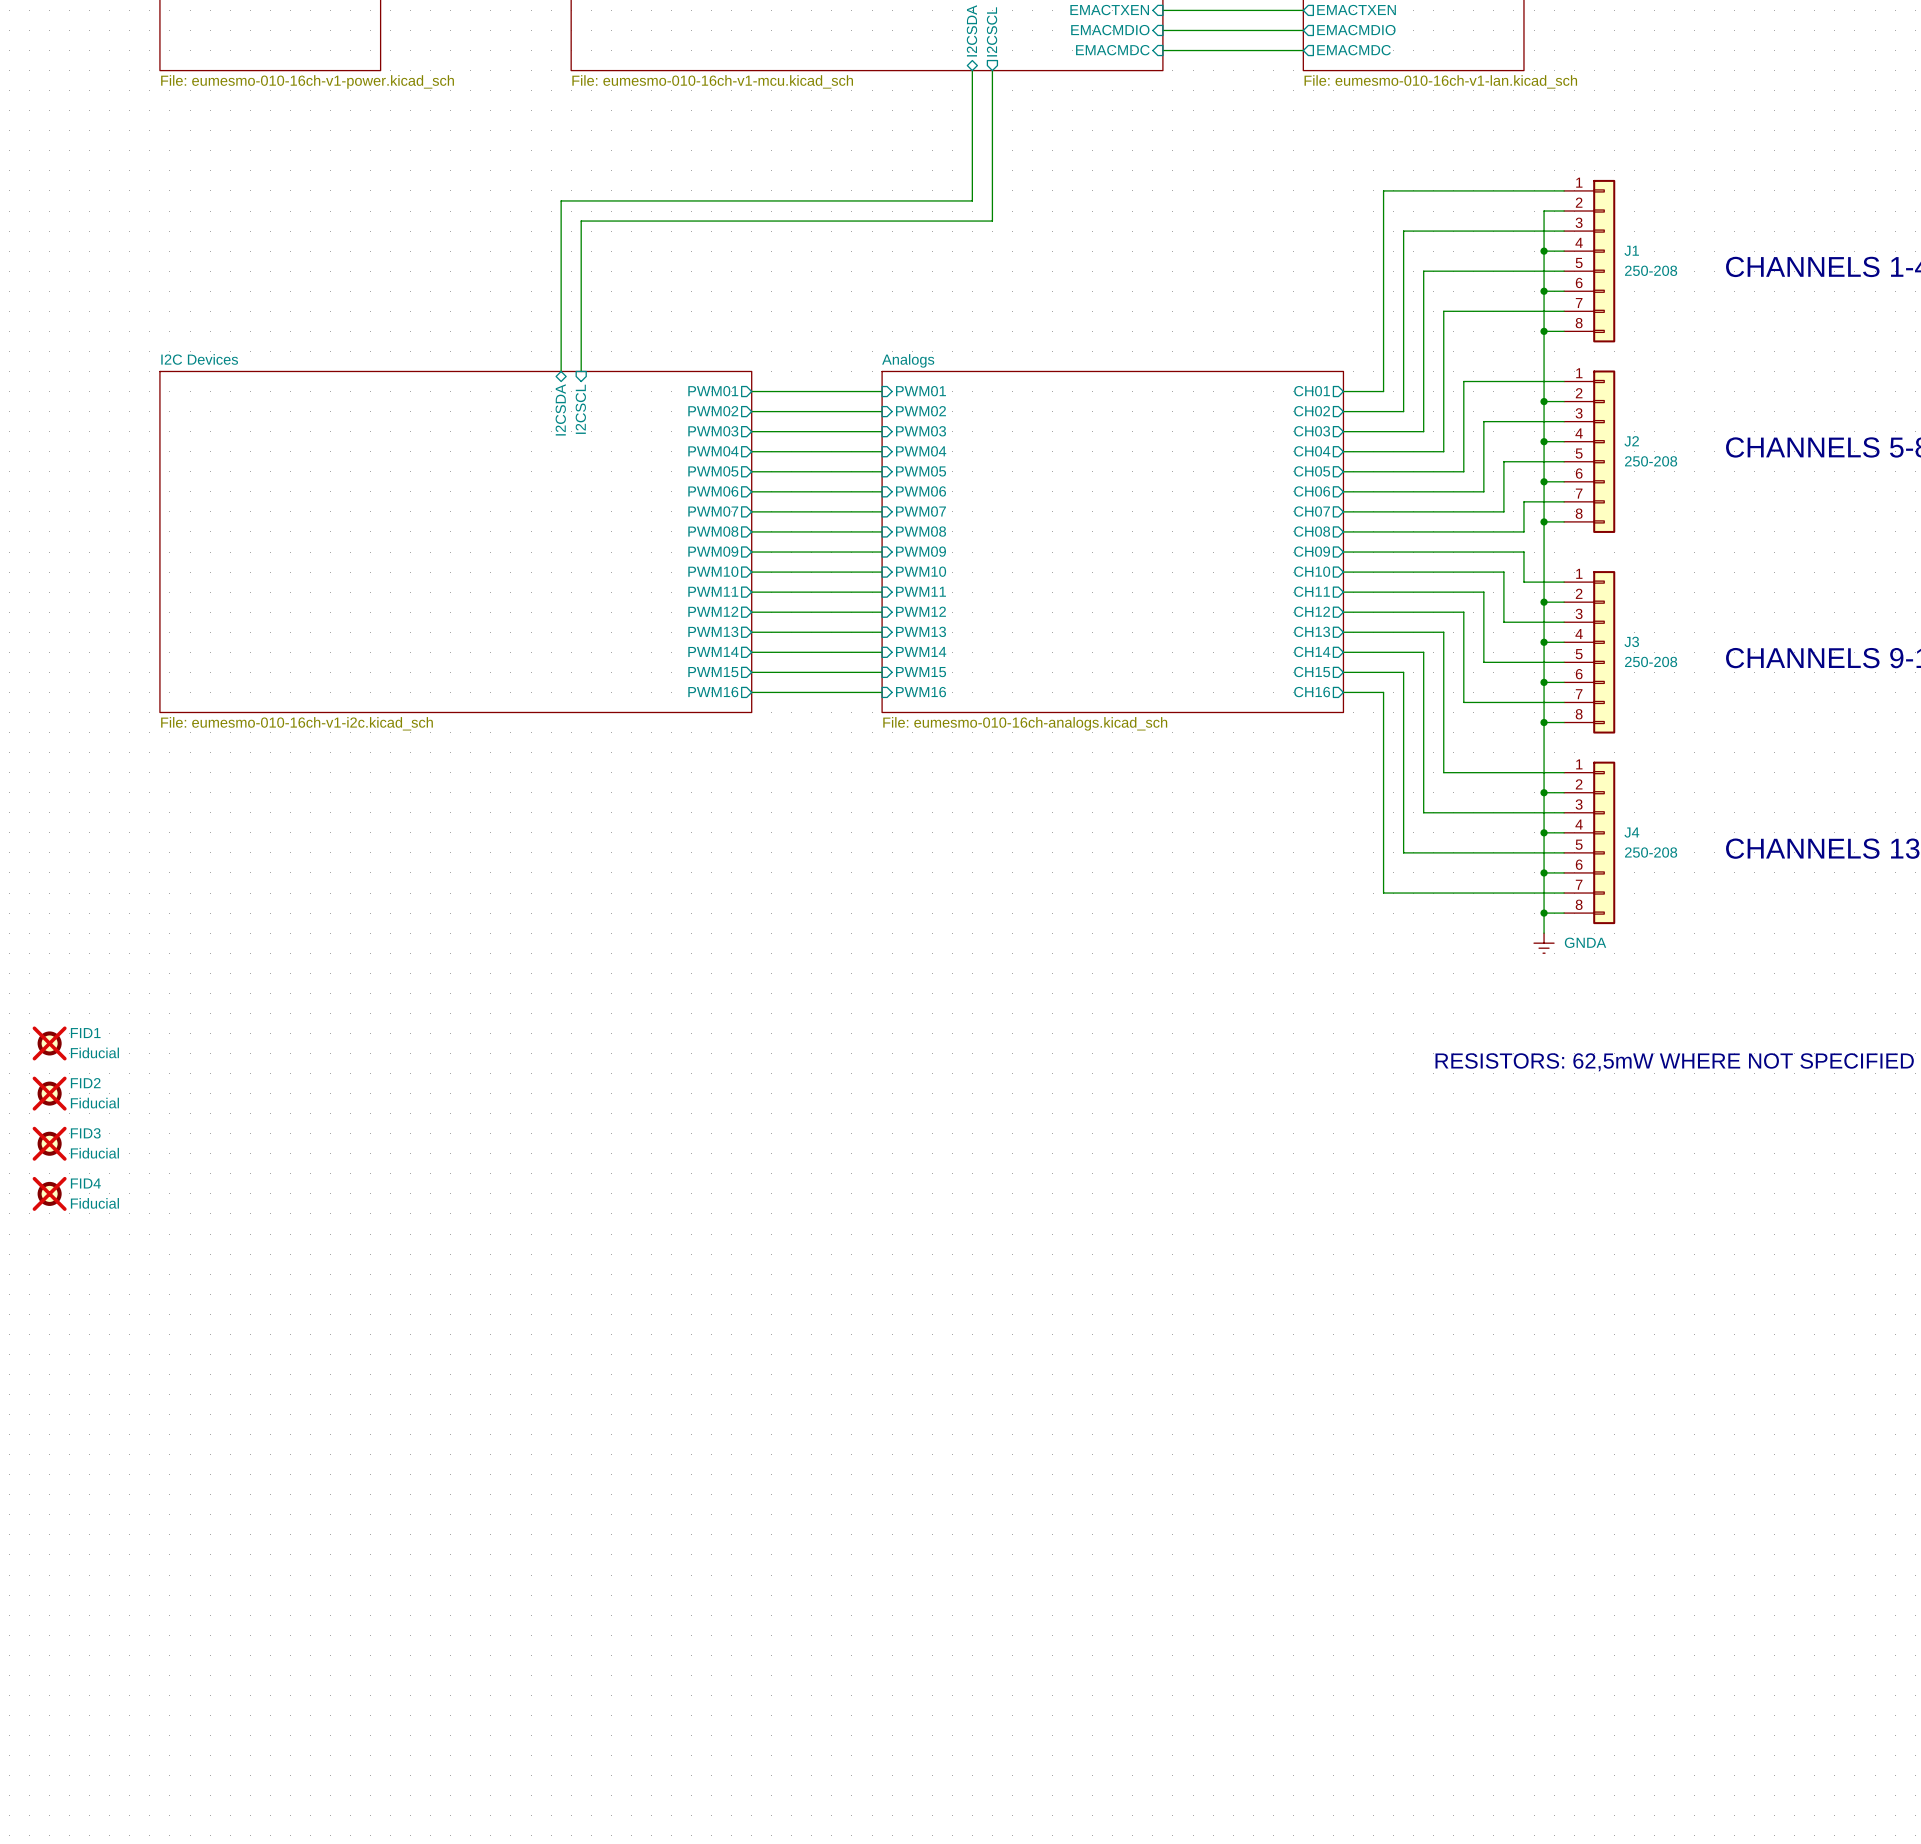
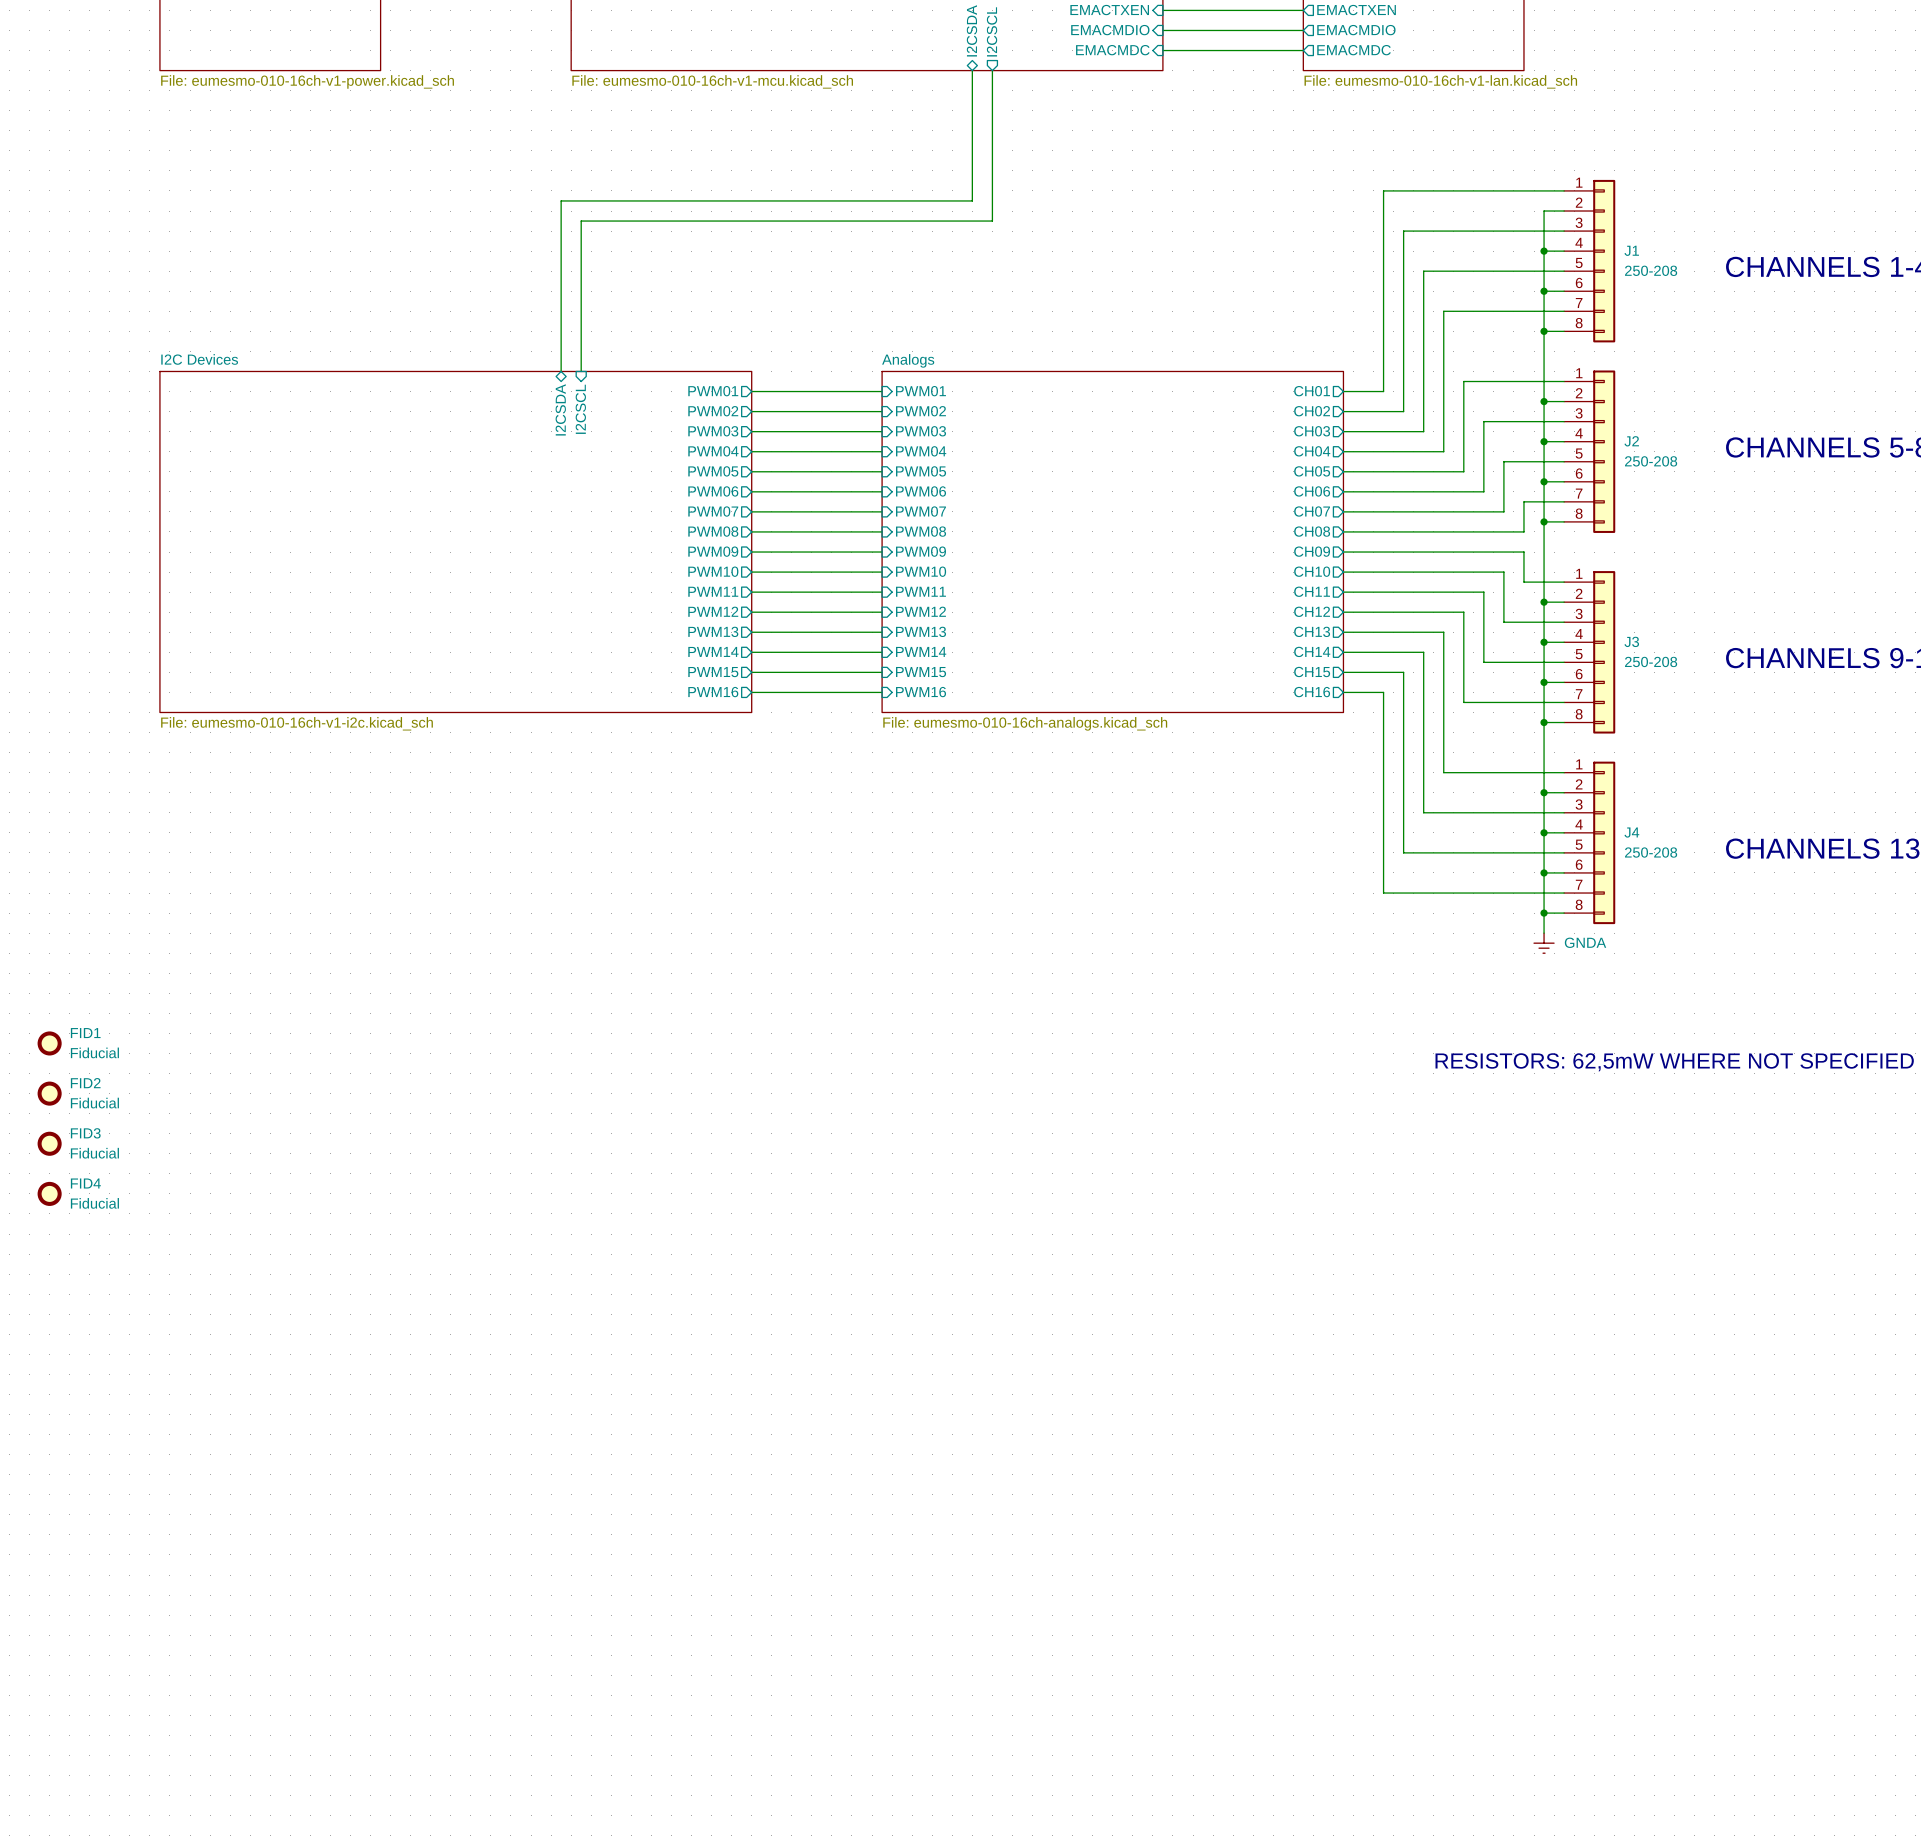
FID1 do-not-place cross: (49, 1043) -> none
FID2 do-not-place cross: (49, 1093) -> none
FID3 do-not-place cross: (49, 1143) -> none
FID4 do-not-place cross: (49, 1193) -> none

